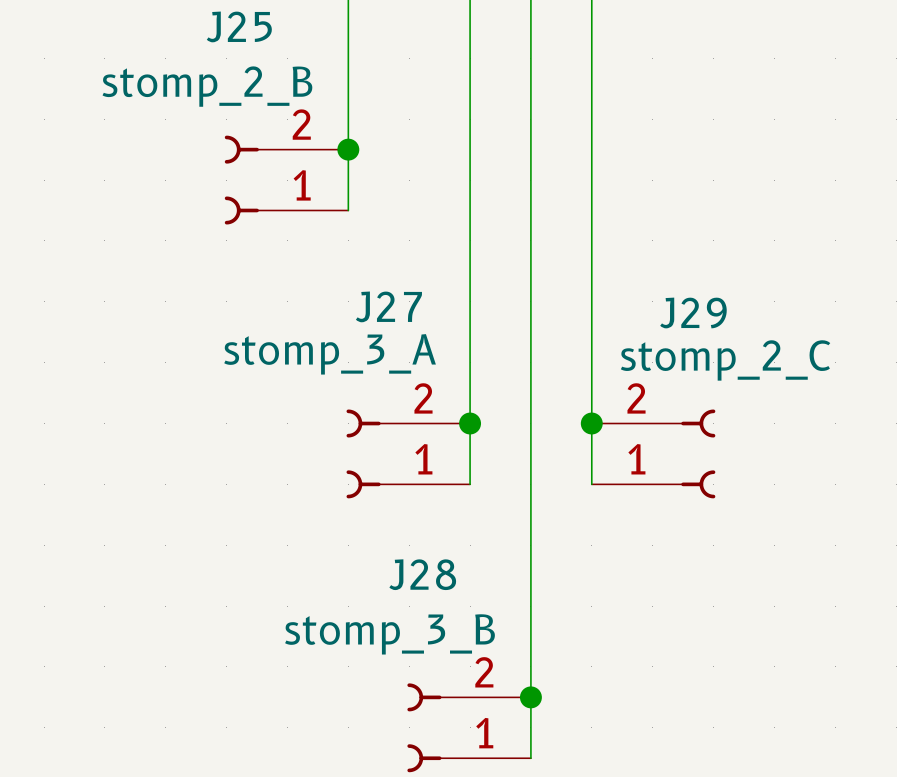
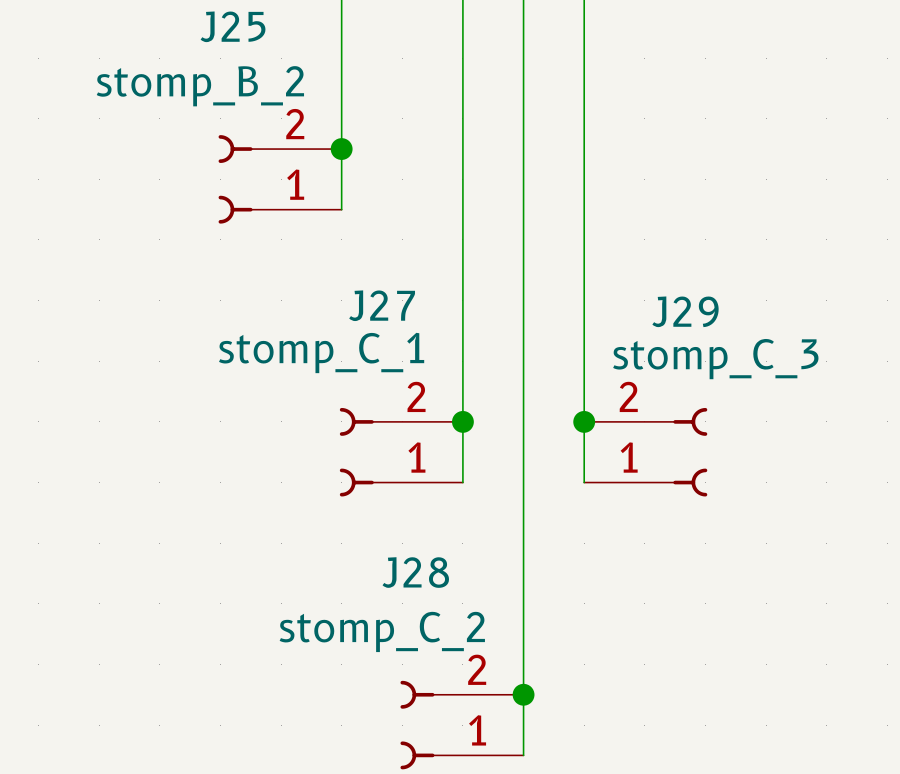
J25 value: stomp_2_B (207, 86) -> stomp_B_2 (200, 86)
J27 value: stomp_3_A (330, 354) -> stomp_C_1 (321, 352)
J29 value: stomp_2_C (725, 360) -> stomp_C_3 (715, 359)
J28 value: stomp_3_B (390, 634) -> stomp_C_2 (382, 631)

